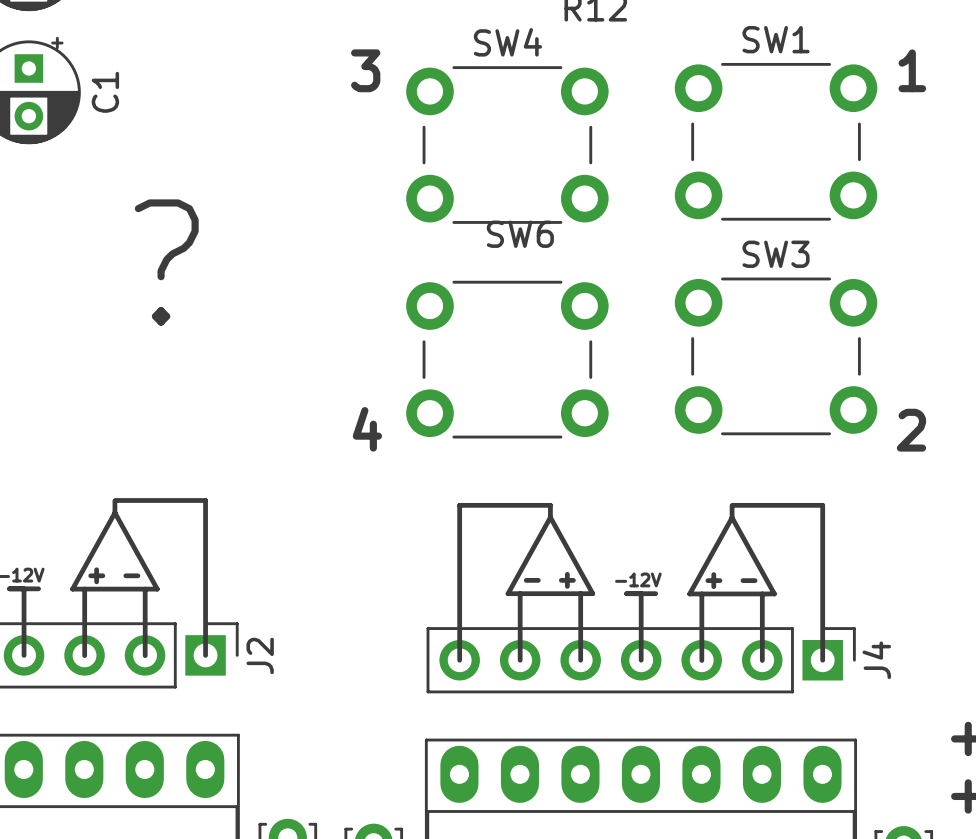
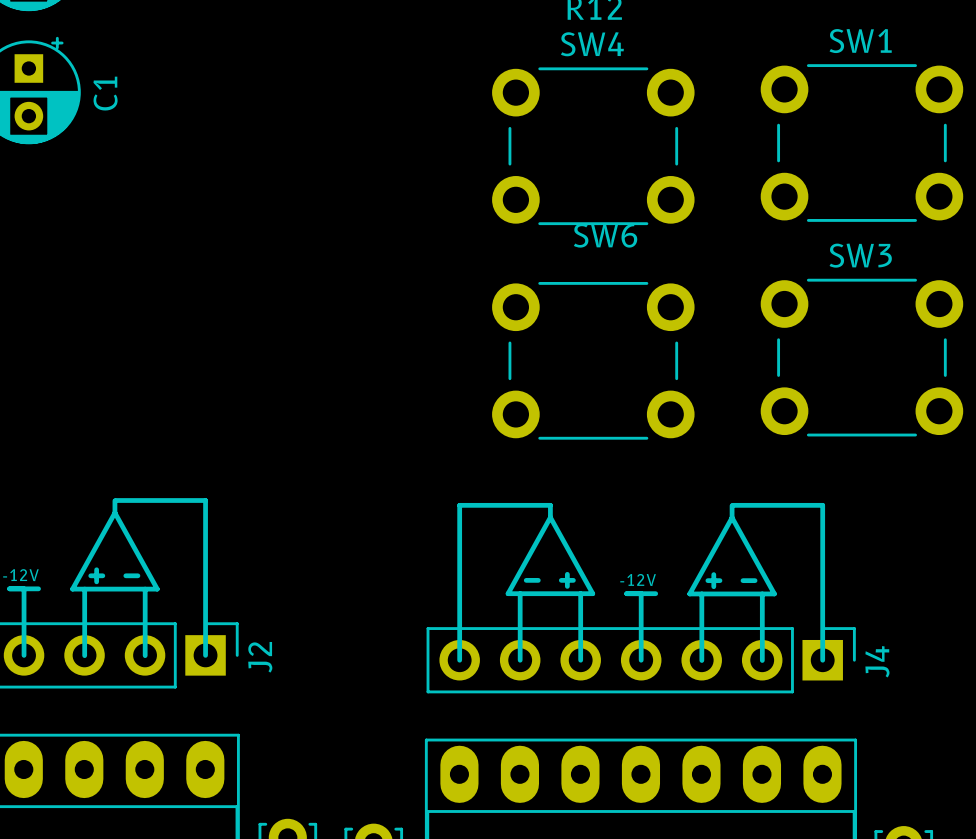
text: 3 (365, 70) -> none
text: 1 (912, 70) -> none
SW1 position: (776, 141) -> (861, 143)
SW4 position: (507, 145) -> (593, 146)
text: ? (166, 262) -> none
SW3 position: (776, 356) -> (861, 357)
SW6 position: (507, 359) -> (593, 360)
text: 4 (367, 429) -> none
text: 2 (911, 430) -> none

